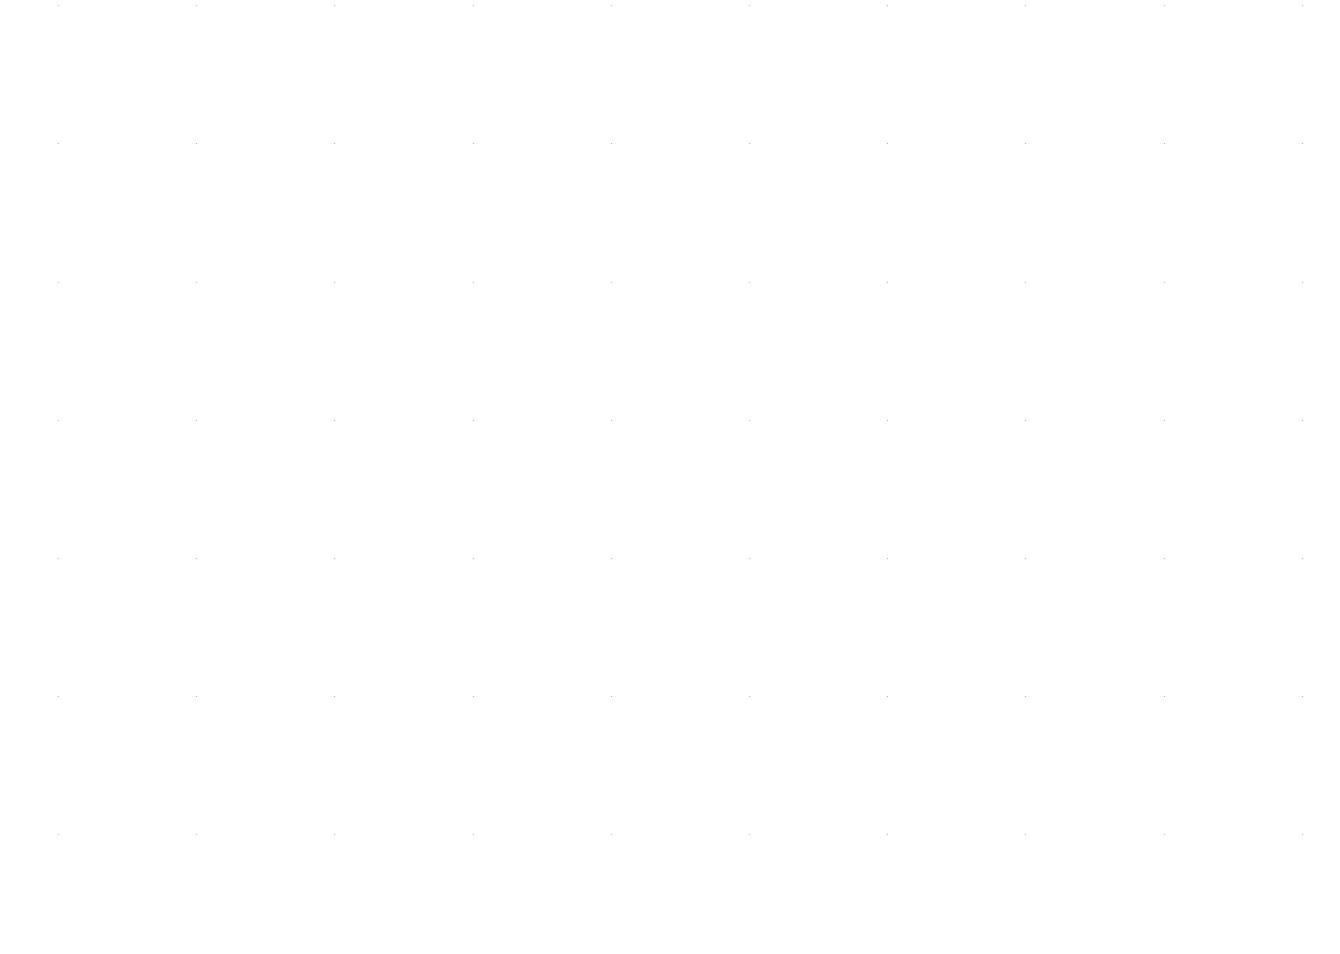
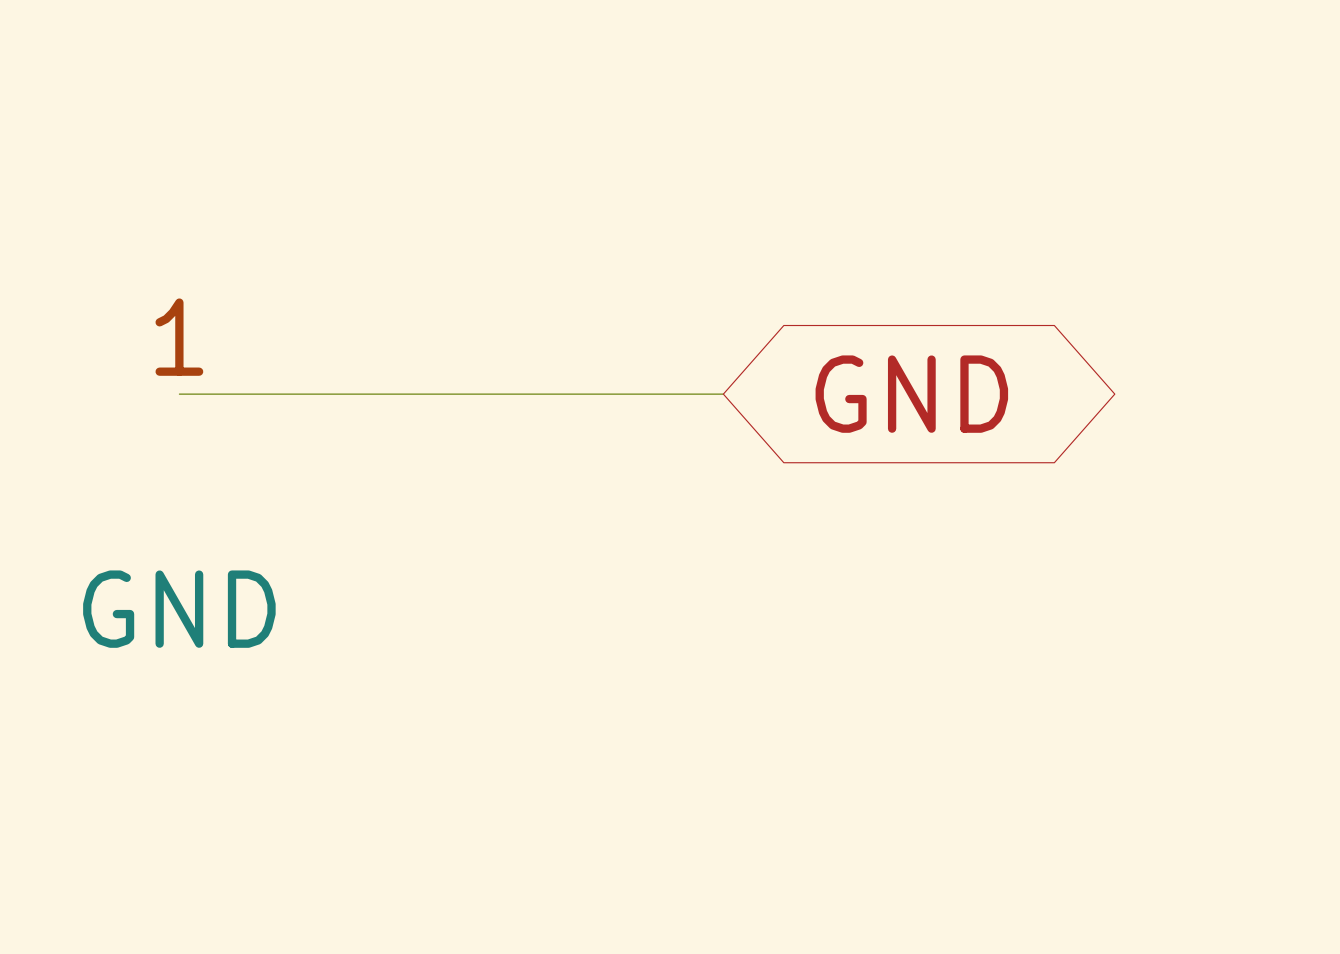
wire: none -> (179, 394) (723, 394)
global label: none -> GND (911, 394)
power symbol: none -> GND (179, 473)

